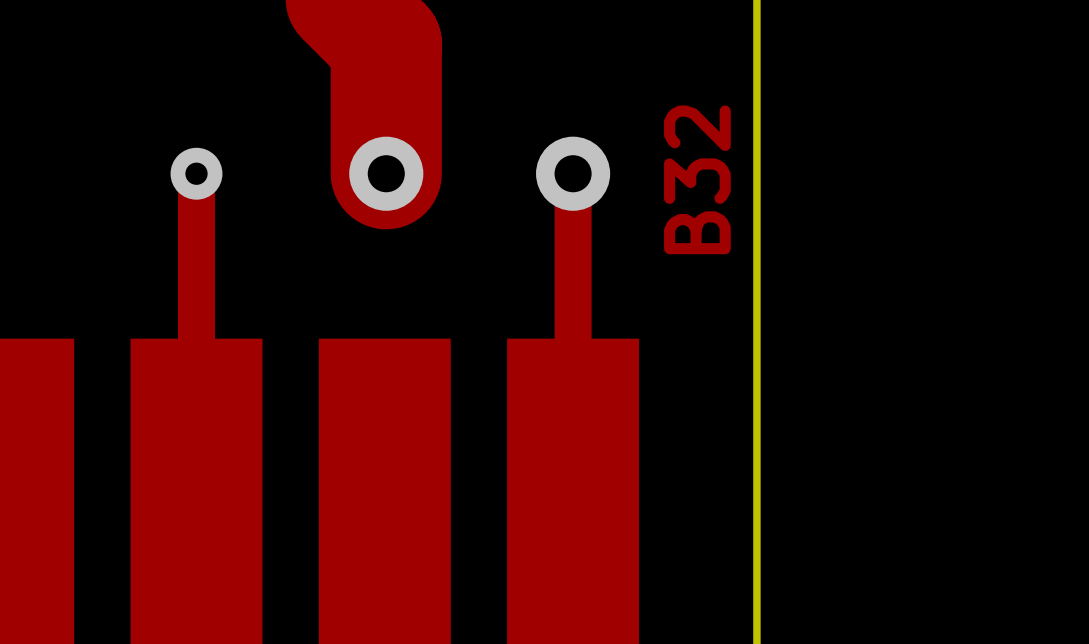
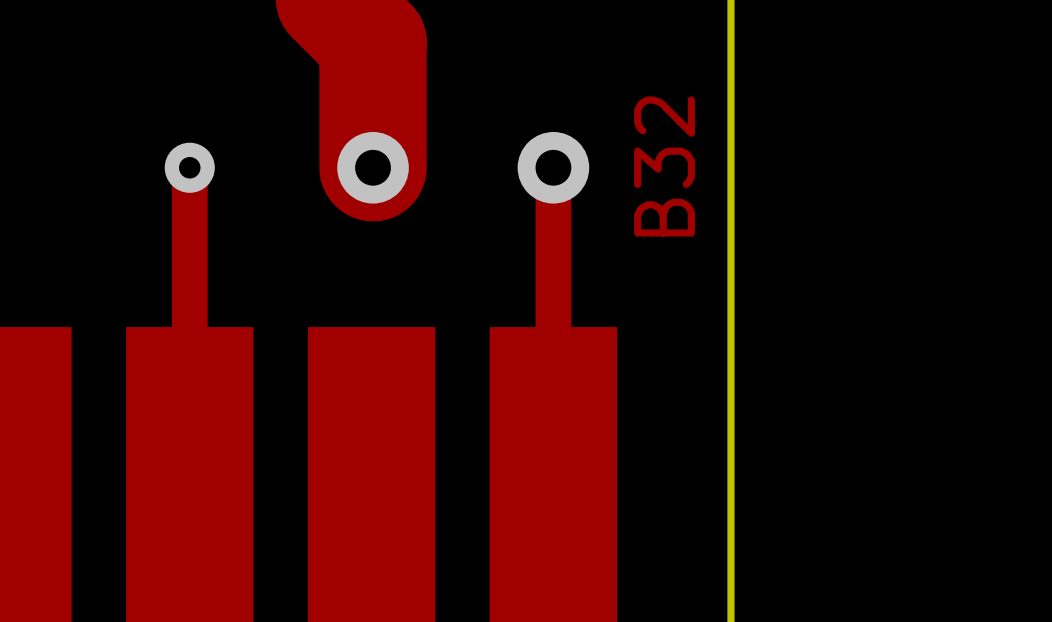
text: none -> B32 (664, 166)
part text: B32 (697, 179) -> none

